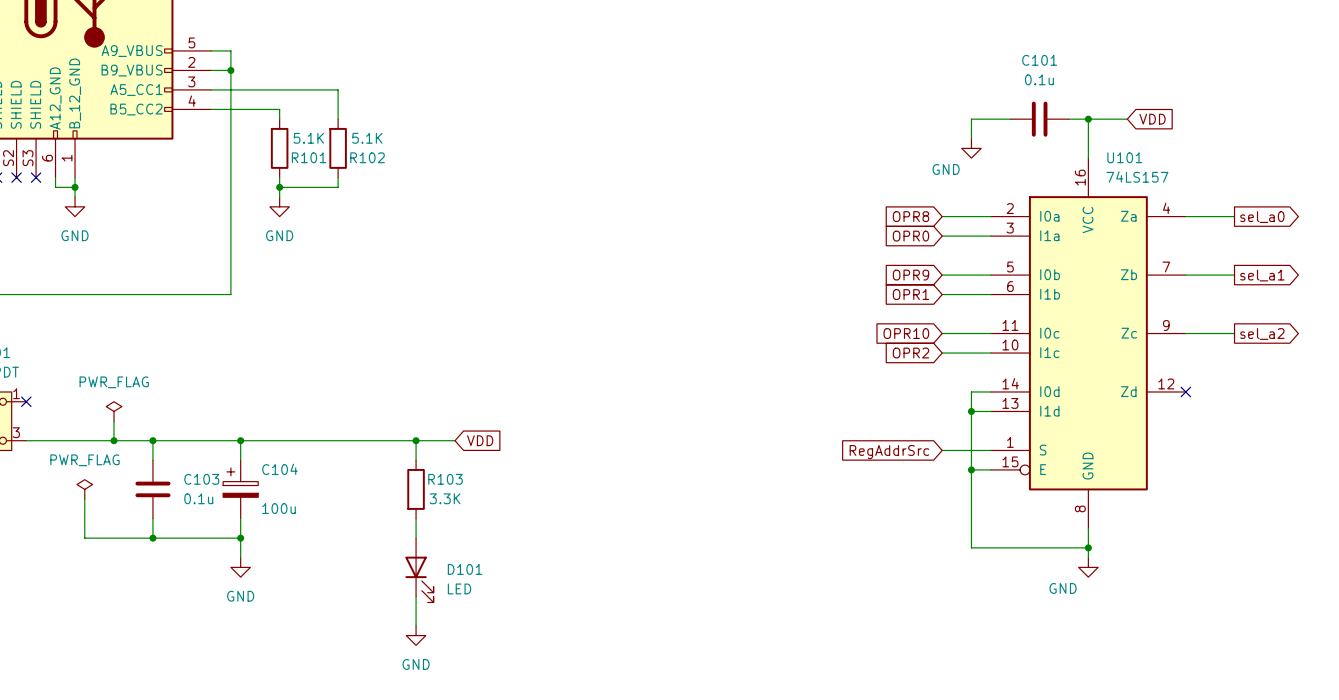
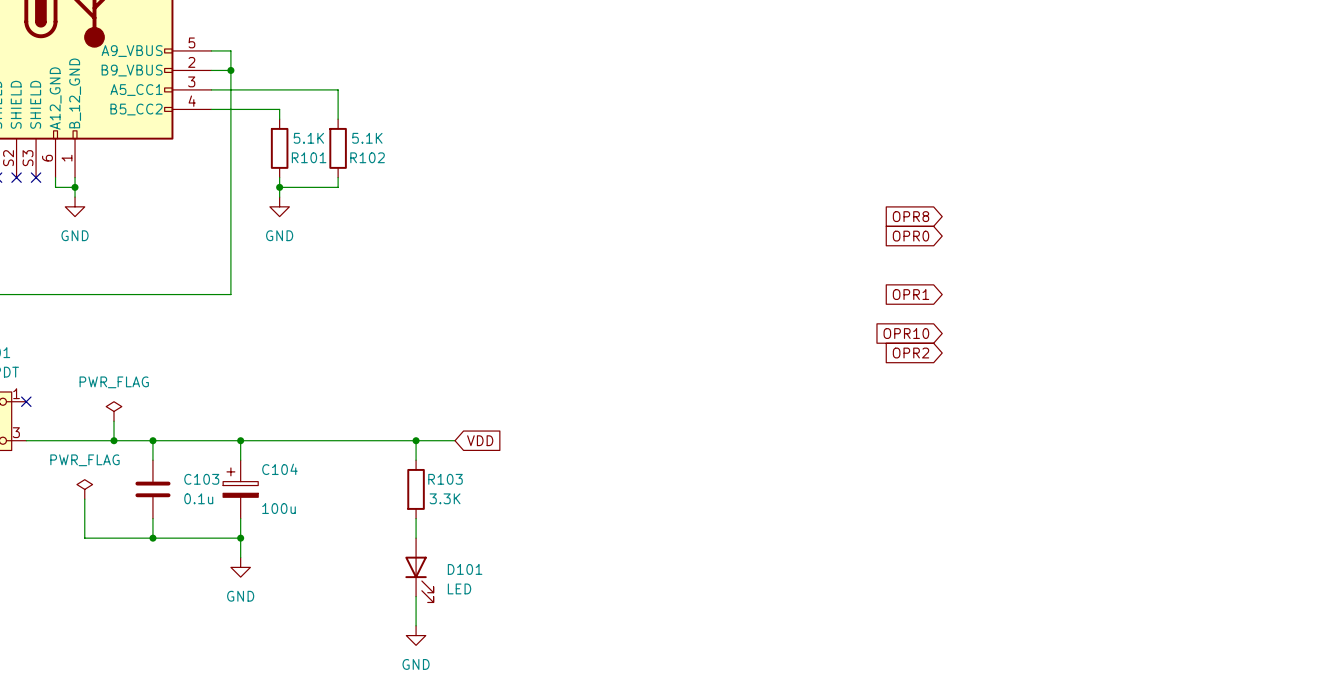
wire: (1010, 119) (971, 119) (971, 138) -> none
C101: 0.1u (1039, 119) -> none
wire: (1068, 119) (1127, 119) -> none
wire: (1088, 119) (1088, 158) -> none
junction: (1088, 119) -> none
global label: VDD (1152, 119) -> none
power symbol: GND (971, 148) -> none
wire: (942, 216) (990, 216) -> none
wire: (1185, 216) (1234, 216) -> none
global label: sel_a0 (1262, 217) -> none
wire: (942, 236) (990, 236) -> none
global label: OPR9 (911, 275) -> none
wire: (942, 275) (990, 275) -> none
wire: (1185, 275) (1234, 275) -> none
global label: sel_a1 (1262, 275) -> none
wire: (942, 294) (990, 294) -> none
wire: (942, 333) (990, 333) -> none
wire: (1185, 333) (1234, 333) -> none
global label: sel_a2 (1262, 333) -> none
U101: 74LS157 (1088, 343) -> none
wire: (942, 353) (990, 353) -> none
wire: (990, 391) (971, 391) (971, 547) (1088, 547) -> none
no-connect mark: (1185, 391) -> none
wire: (971, 411) (990, 411) -> none
junction: (971, 411) -> none
wire: (942, 450) (990, 450) -> none
global label: RegAddrSrc (889, 452) -> none
wire: (971, 469) (990, 469) -> none
junction: (971, 469) -> none
wire: (1088, 528) (1088, 557) -> none
junction: (1088, 547) -> none
power symbol: GND (1088, 567) -> none

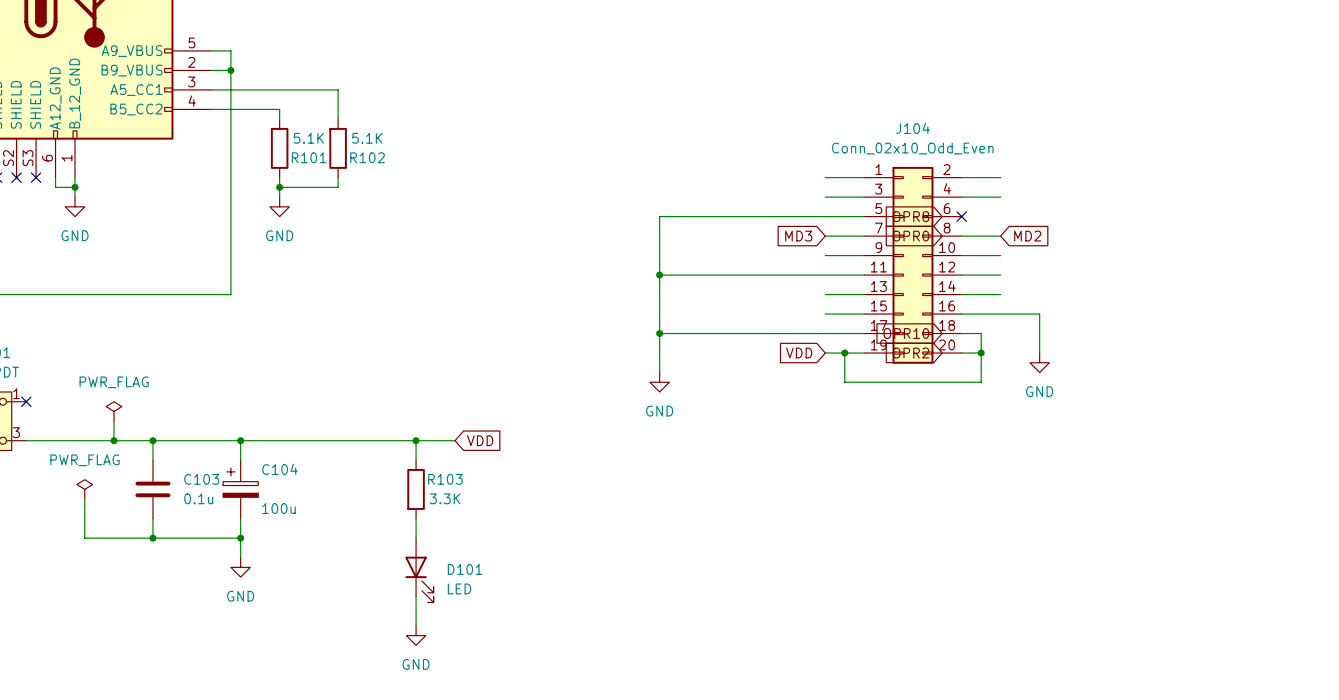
wire: none -> (825, 177) (864, 177)
wire: none -> (961, 177) (1000, 177)
wire: none -> (825, 197) (864, 197)
wire: none -> (961, 197) (1000, 197)
wire: none -> (864, 216) (659, 216) (659, 372)
no-connect mark: none -> (961, 216)
global label: none -> MD3 (798, 236)
wire: none -> (825, 236) (864, 236)
wire: none -> (961, 236) (1000, 236)
global label: none -> MD2 (1027, 236)
wire: none -> (825, 255) (864, 255)
wire: none -> (961, 255) (1000, 255)
J104: none -> Conn_02x10_Odd_Even (912, 265)
wire: none -> (659, 275) (864, 275)
junction: none -> (659, 275)
wire: none -> (961, 275) (1000, 275)
wire: none -> (825, 294) (864, 294)
global label: OPR1 (911, 294) -> none
wire: none -> (961, 294) (1000, 294)
wire: none -> (825, 314) (864, 314)
wire: none -> (961, 314) (1039, 314) (1039, 353)
wire: none -> (659, 333) (864, 333)
junction: none -> (659, 333)
wire: none -> (961, 333) (981, 333) (981, 382) (844, 382) (844, 353)
global label: none -> VDD (799, 353)
wire: none -> (825, 353) (864, 353)
junction: none -> (844, 353)
wire: none -> (961, 353) (981, 353)
junction: none -> (981, 353)
power symbol: none -> GND (1039, 362)
power symbol: none -> GND (659, 382)

